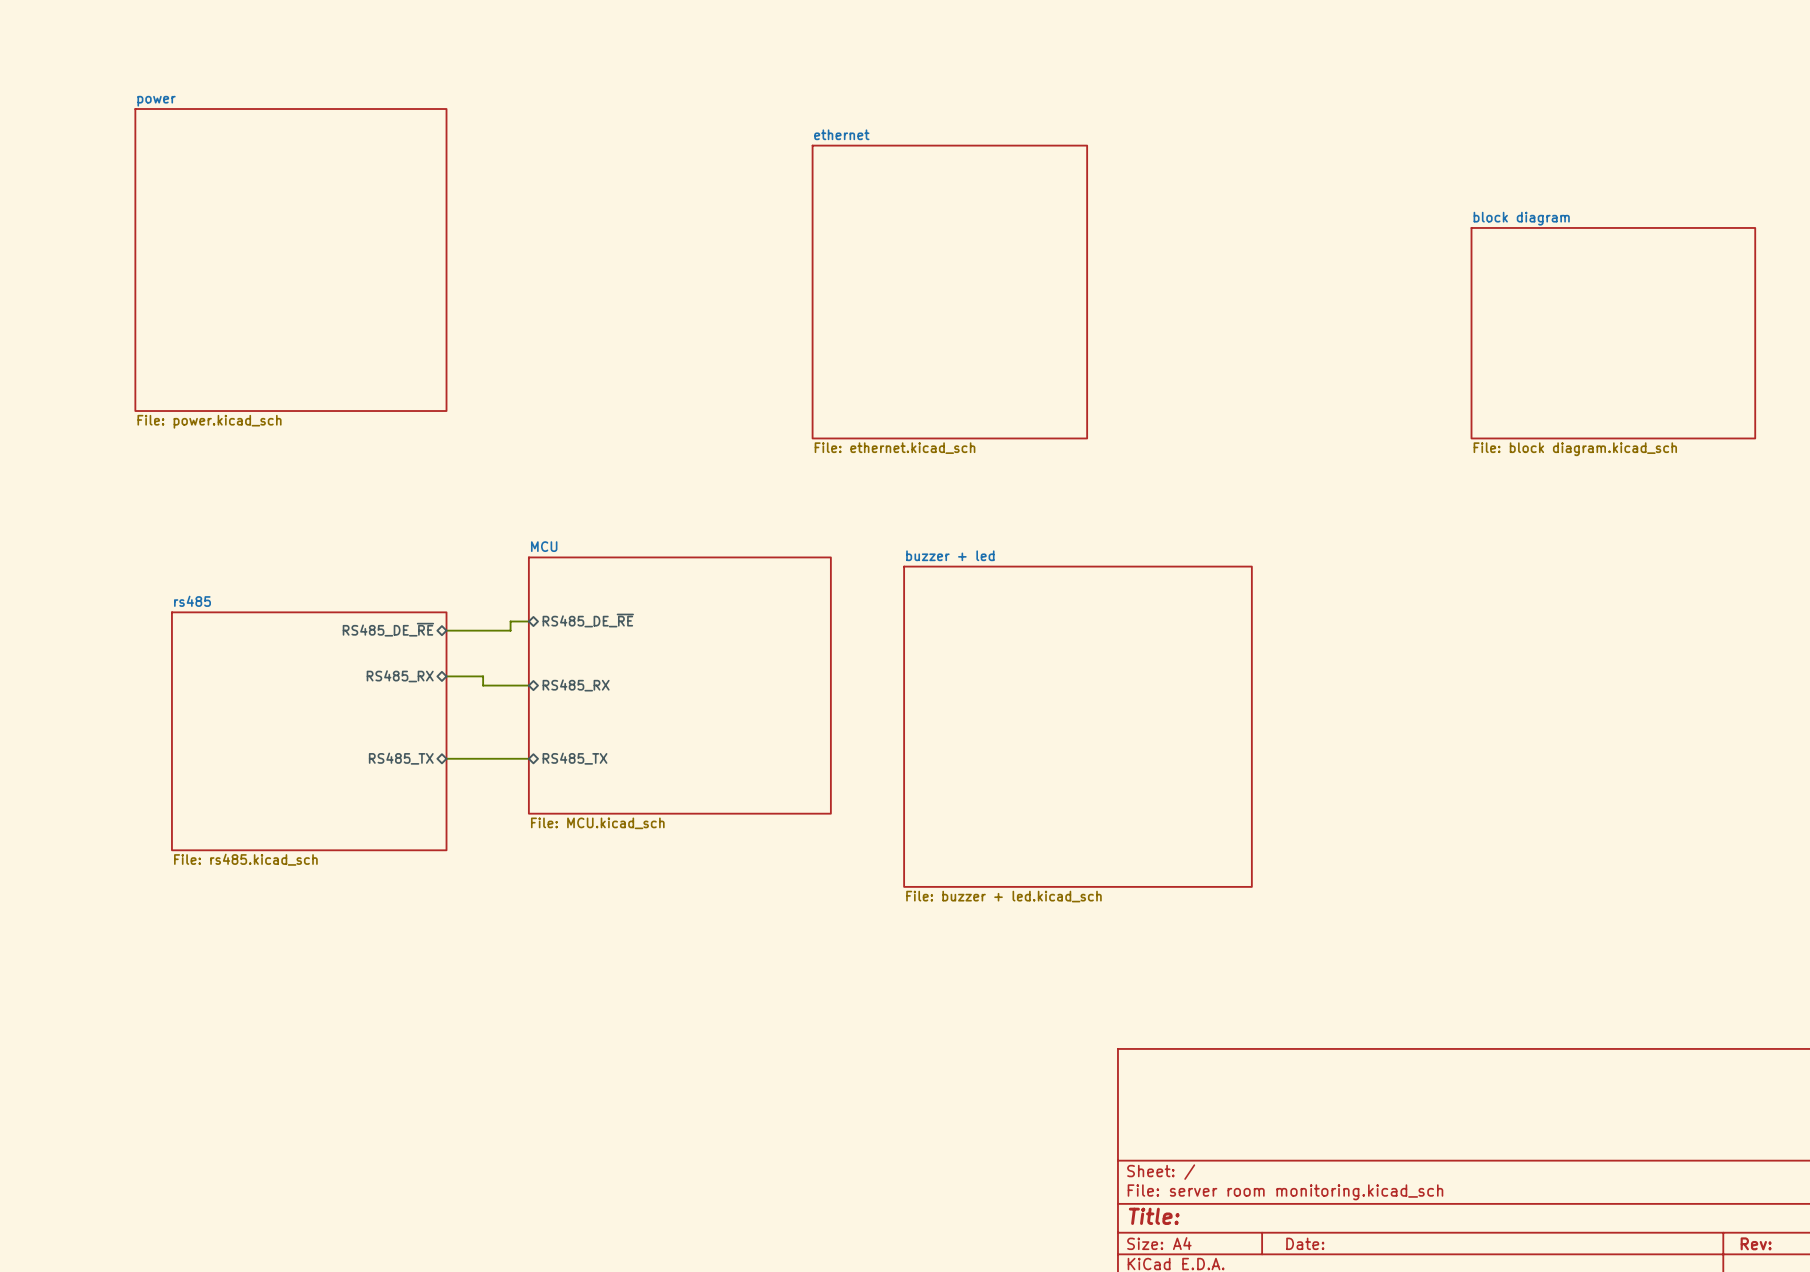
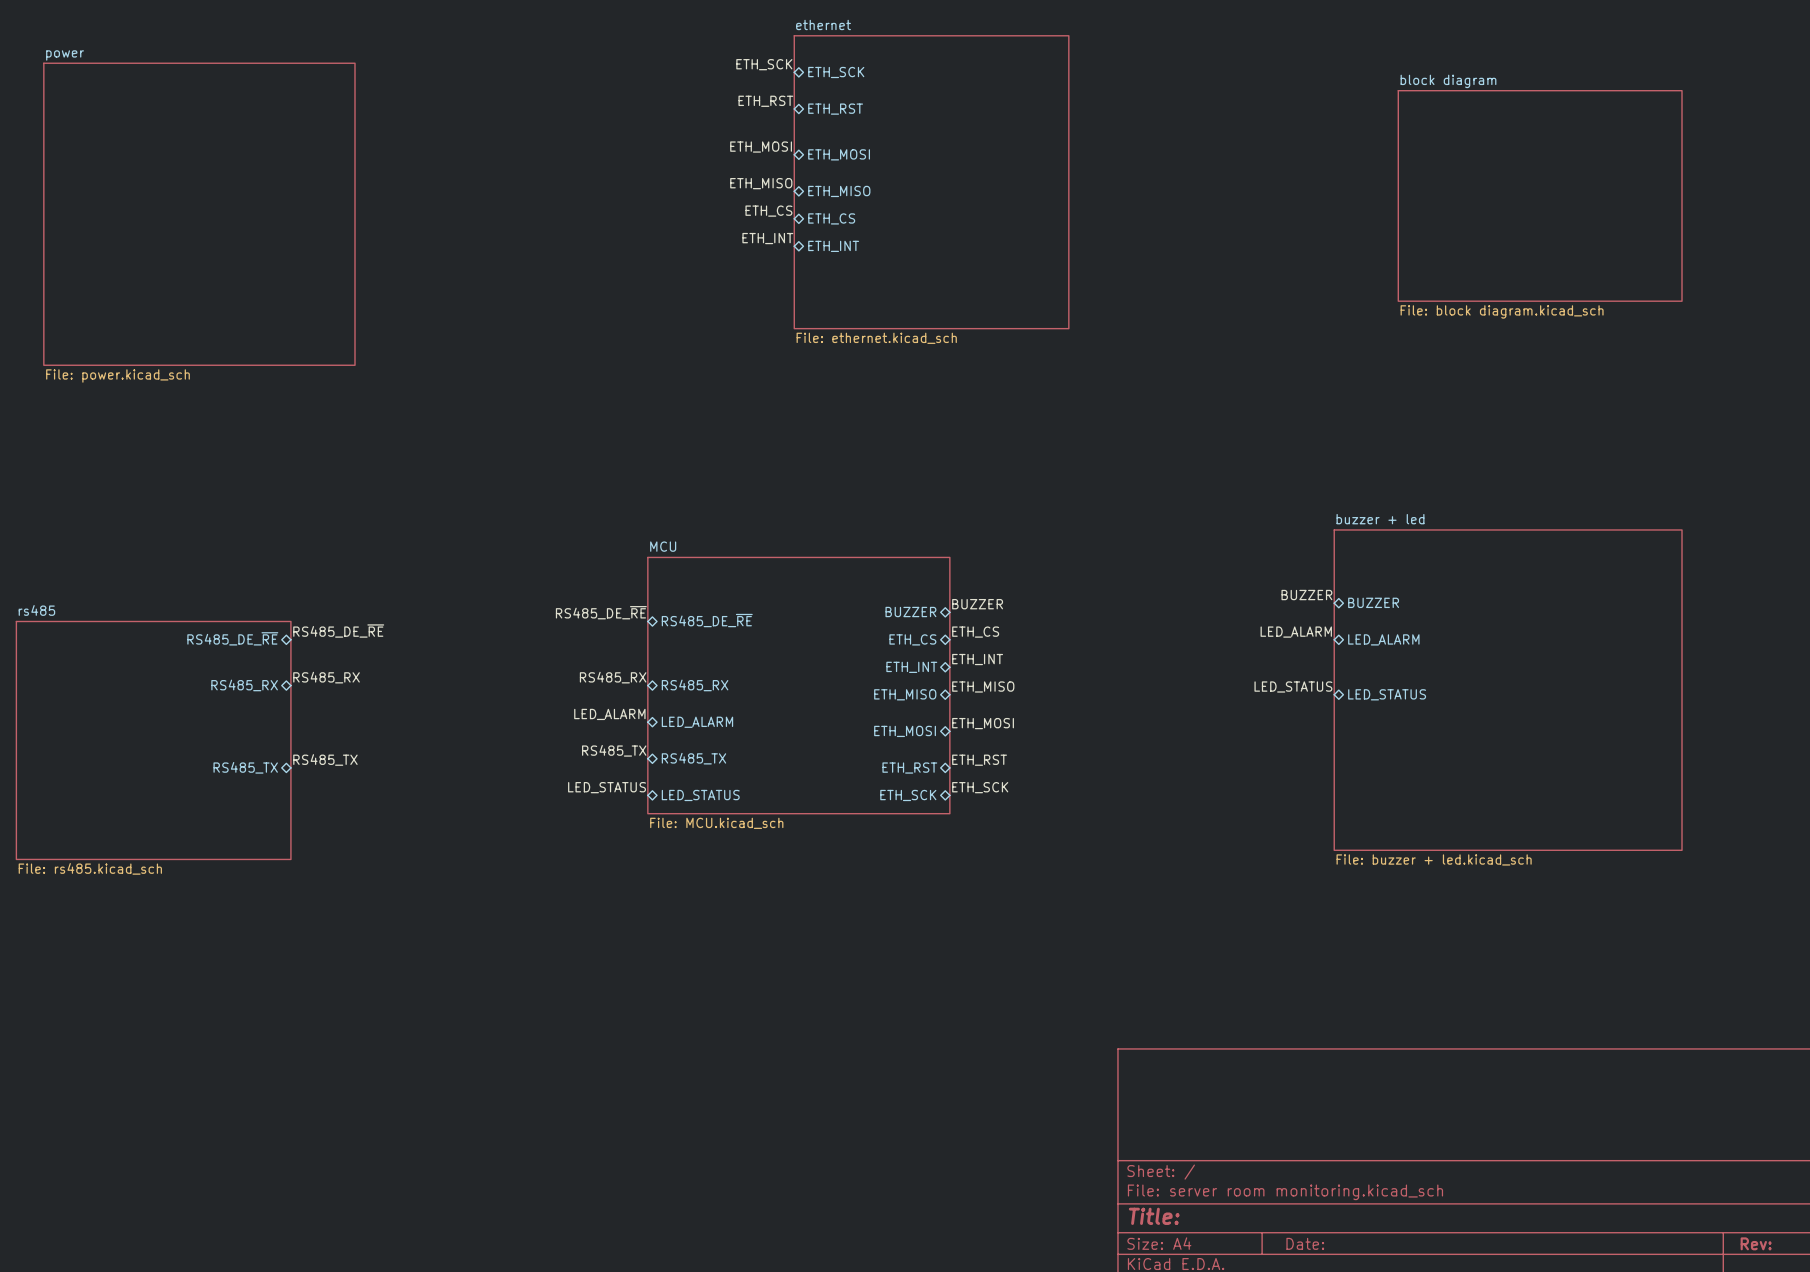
label: none -> ETH_SCK (764, 64)
sheet pin: none -> ETH_SCK (836, 72)
label: none -> ETH_RST (765, 101)
sheet pin: none -> ETH_RST (835, 109)
label: none -> ETH_MOSI (761, 147)
sheet pin: none -> ETH_MOSI (839, 154)
label: none -> ETH_MISO (761, 183)
sheet pin: none -> ETH_MISO (839, 191)
label: none -> ETH_CS (768, 211)
sheet pin: none -> ETH_CS (831, 218)
label: none -> ETH_INT (767, 238)
sheet pin: none -> ETH_INT (833, 246)
sheet power position: (290, 260) -> (199, 214)
sheet ethernet position: (949, 292) -> (931, 182)
sheet block diagram position: (1613, 333) -> (1540, 195)
label: none -> BUZZER (1306, 595)
sheet pin: none -> BUZZER (1373, 602)
label: none -> BUZZER (977, 604)
label: none -> RS485_DE_~{RE} (601, 612)
sheet pin: none -> BUZZER (910, 612)
sheet pin position: RS485_DE_~{RE} (588, 620) -> RS485_DE_~{RE} (707, 620)
wire: (528, 621) (510, 621) (510, 630) (446, 630) -> none
sheet pin: RS485_DE_~{RE} (388, 629) -> none
label: none -> RS485_DE_~{RE} (338, 631)
label: none -> ETH_CS (975, 632)
label: none -> LED_ALARM (1296, 632)
sheet pin: none -> RS485_DE_~{RE} (232, 638)
sheet pin: none -> ETH_CS (912, 639)
sheet pin: none -> LED_ALARM (1383, 639)
label: none -> ETH_INT (977, 659)
sheet pin: none -> ETH_INT (911, 667)
sheet pin: RS485_RX (400, 676) -> none
wire: (446, 676) (483, 676) (483, 685) (528, 685) -> none
label: none -> RS485_RX (326, 677)
label: none -> RS485_RX (613, 677)
sheet pin: none -> RS485_RX (244, 685)
sheet pin: RS485_RX (576, 685) -> none
sheet MCU position: (679, 685) -> (798, 685)
sheet pin: none -> RS485_RX (695, 685)
label: none -> ETH_MISO (983, 686)
label: none -> LED_STATUS (1293, 686)
sheet buzzer + led: none -> File: buzzer + led.kicad_sch (1508, 690)
sheet pin: none -> ETH_MISO (905, 694)
sheet pin: none -> LED_STATUS (1387, 694)
label: none -> LED_ALARM (609, 714)
sheet pin: none -> LED_ALARM (697, 722)
label: none -> ETH_MOSI (983, 723)
sheet buzzer + led: File: buzzer + led.kicad_sch (1077, 726) -> none
sheet rs485 position: (309, 731) -> (153, 740)
sheet pin: none -> ETH_MOSI (905, 731)
label: none -> RS485_TX (614, 750)
sheet pin: RS485_TX (401, 758) -> none
wire: (446, 758) (528, 758) -> none
sheet pin: RS485_TX (575, 758) -> none
sheet pin: none -> RS485_TX (693, 758)
label: none -> RS485_TX (325, 759)
label: none -> ETH_RST (979, 760)
sheet pin: none -> RS485_TX (245, 767)
sheet pin: none -> ETH_RST (909, 768)
label: none -> LED_STATUS (607, 787)
label: none -> ETH_SCK (980, 787)
sheet pin: none -> LED_STATUS (700, 795)
sheet pin: none -> ETH_SCK (908, 795)

